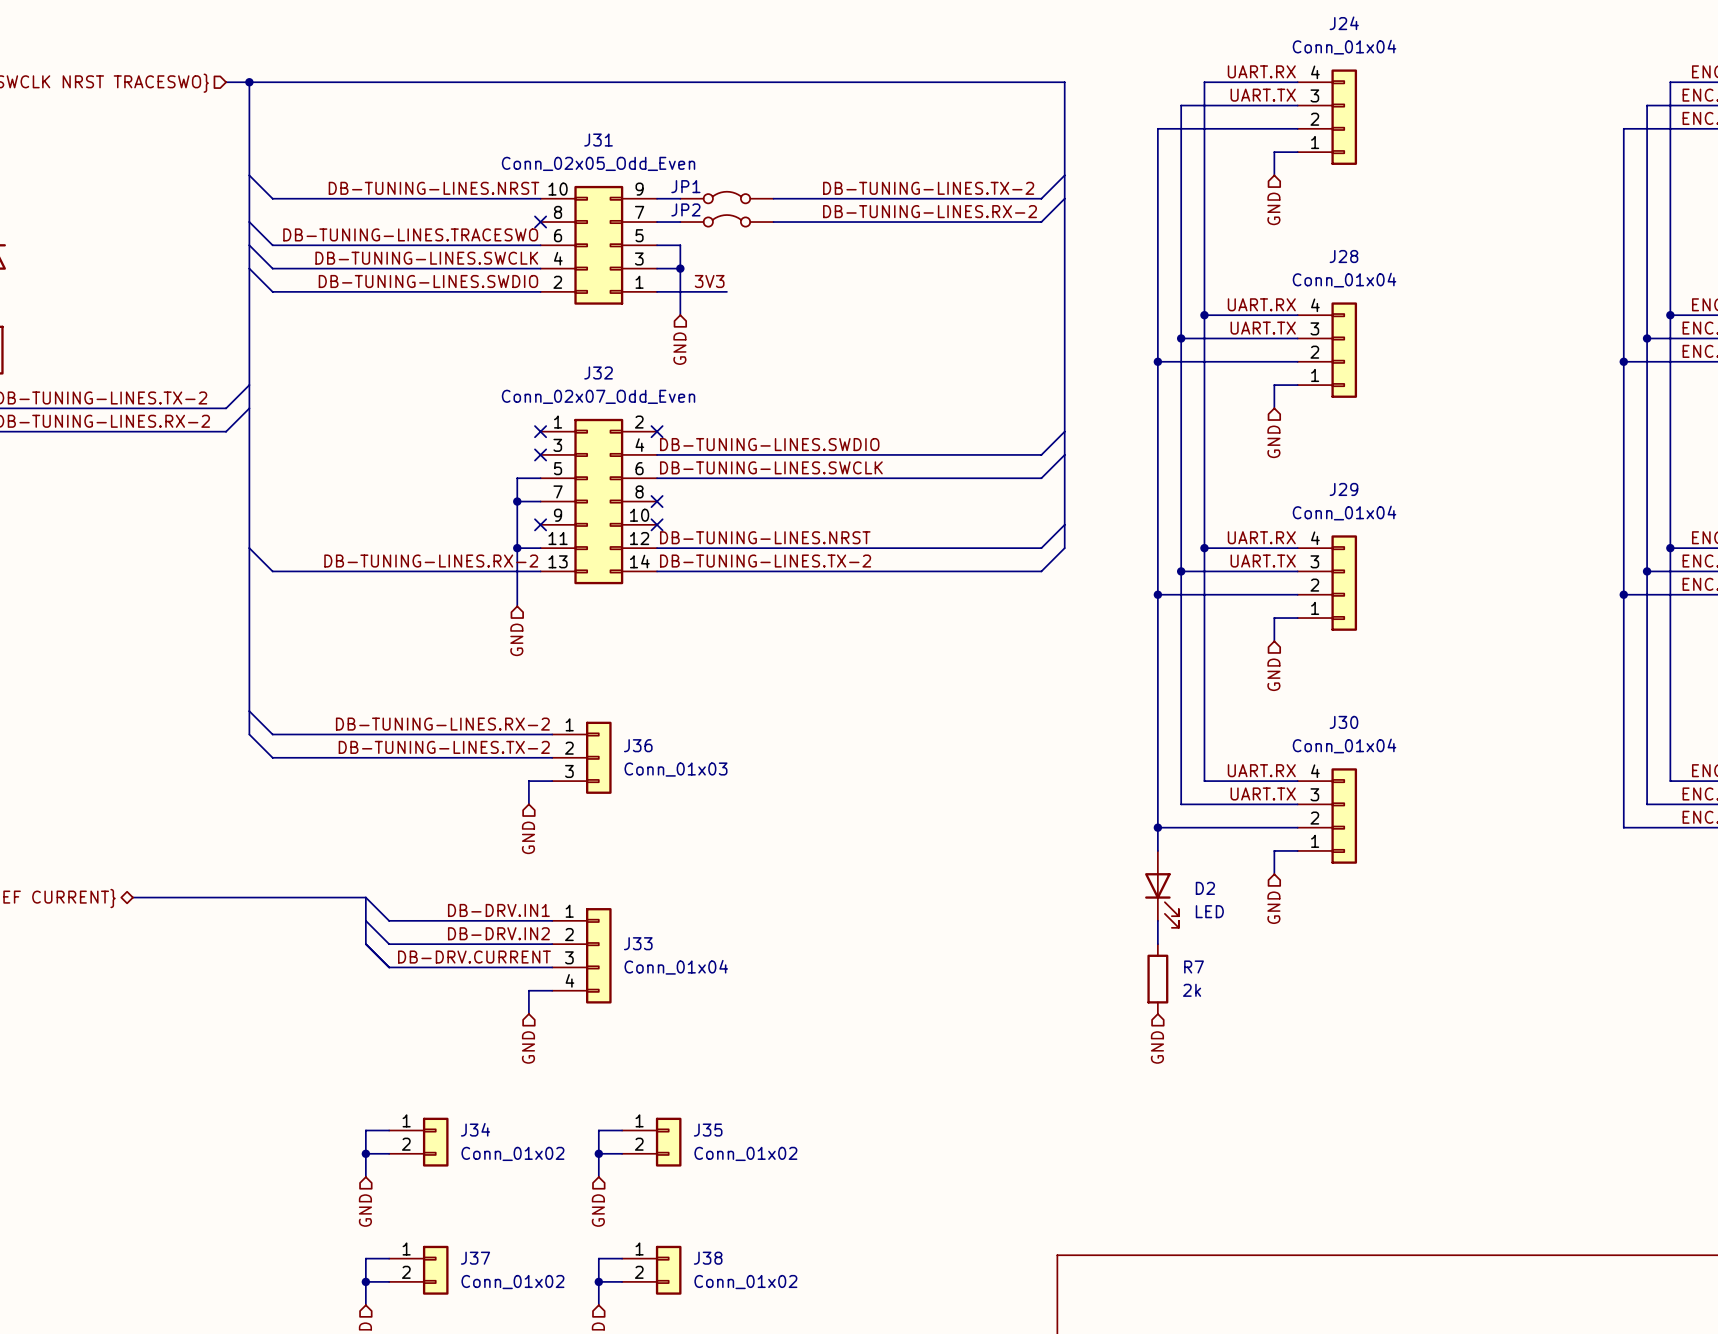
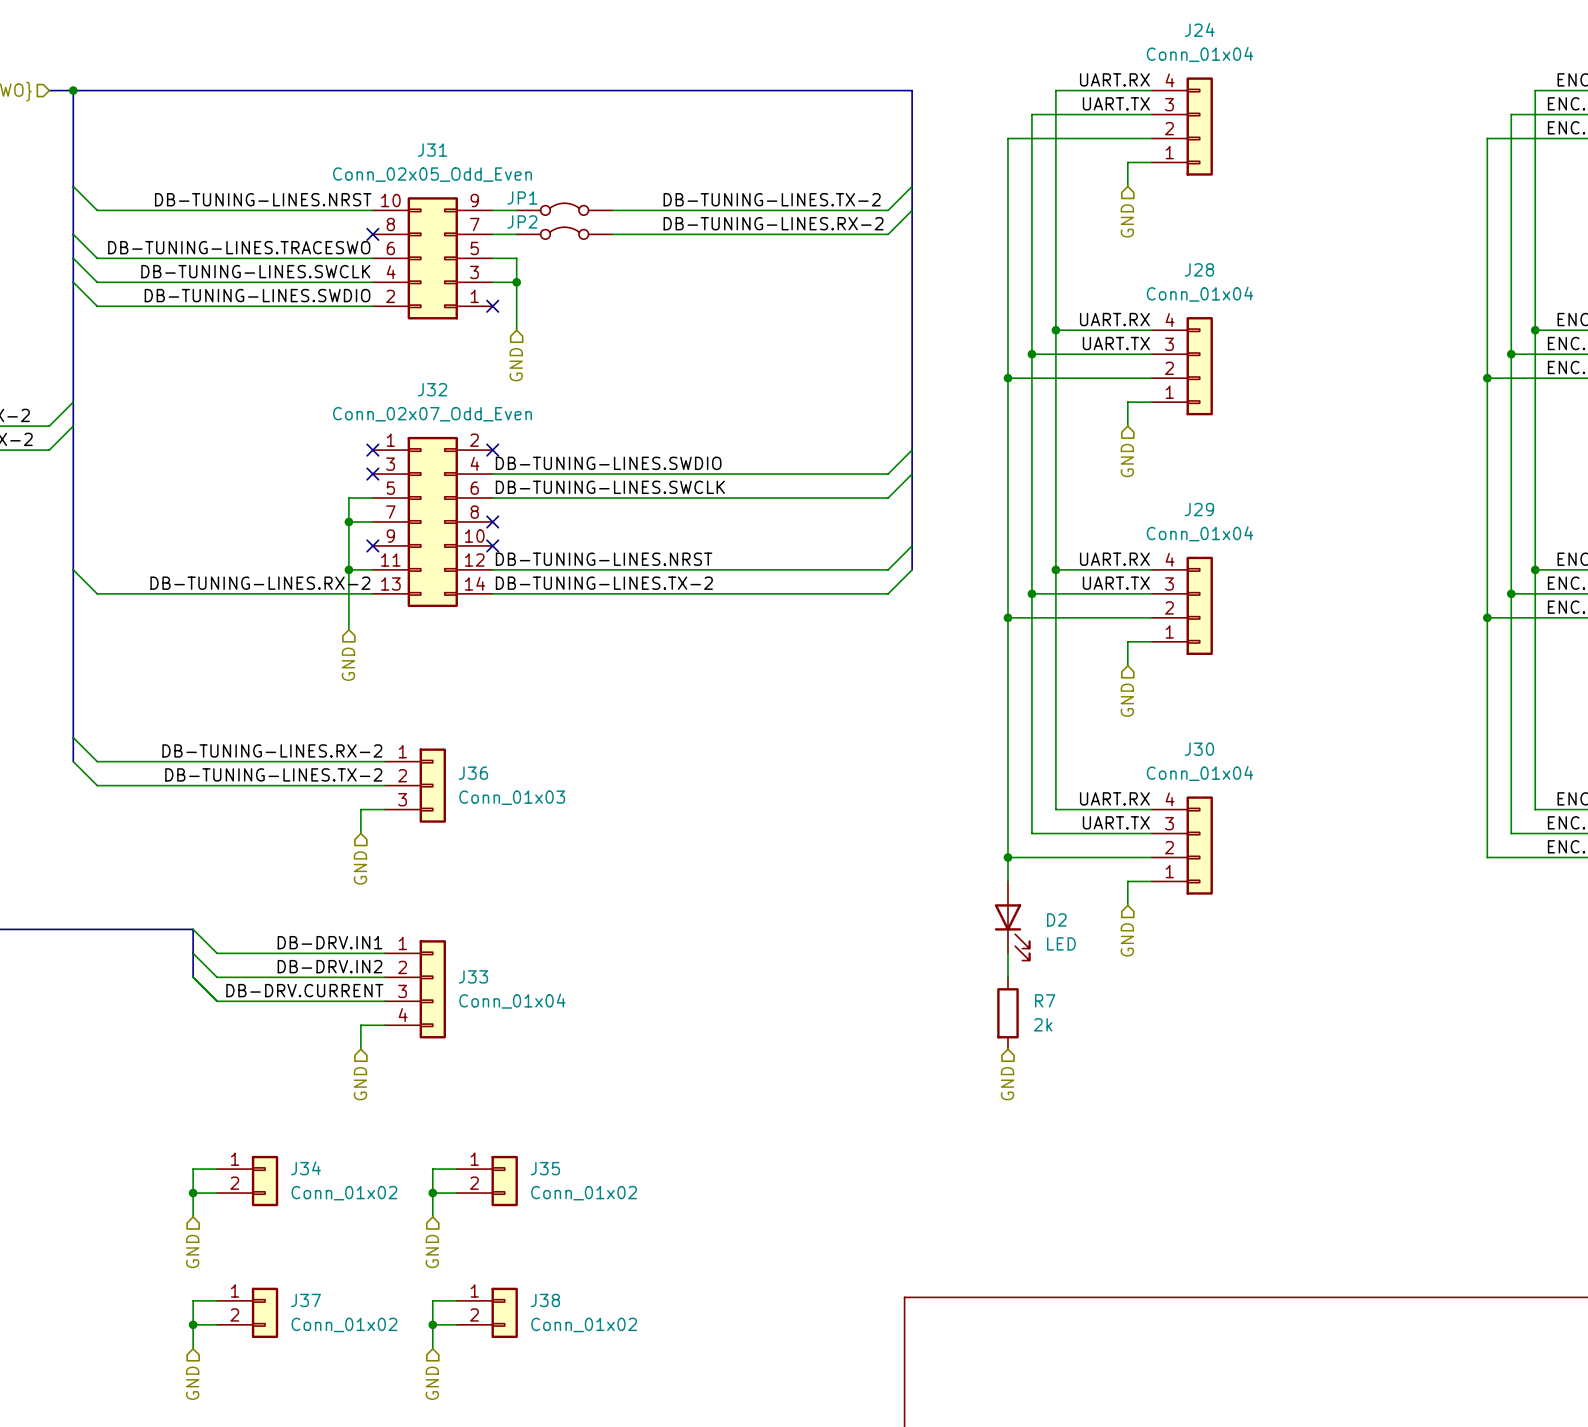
label: 3V3 (709, 281) -> none
wire: (657, 291) (726, 291) -> none
no-connect mark: none -> (492, 306)

